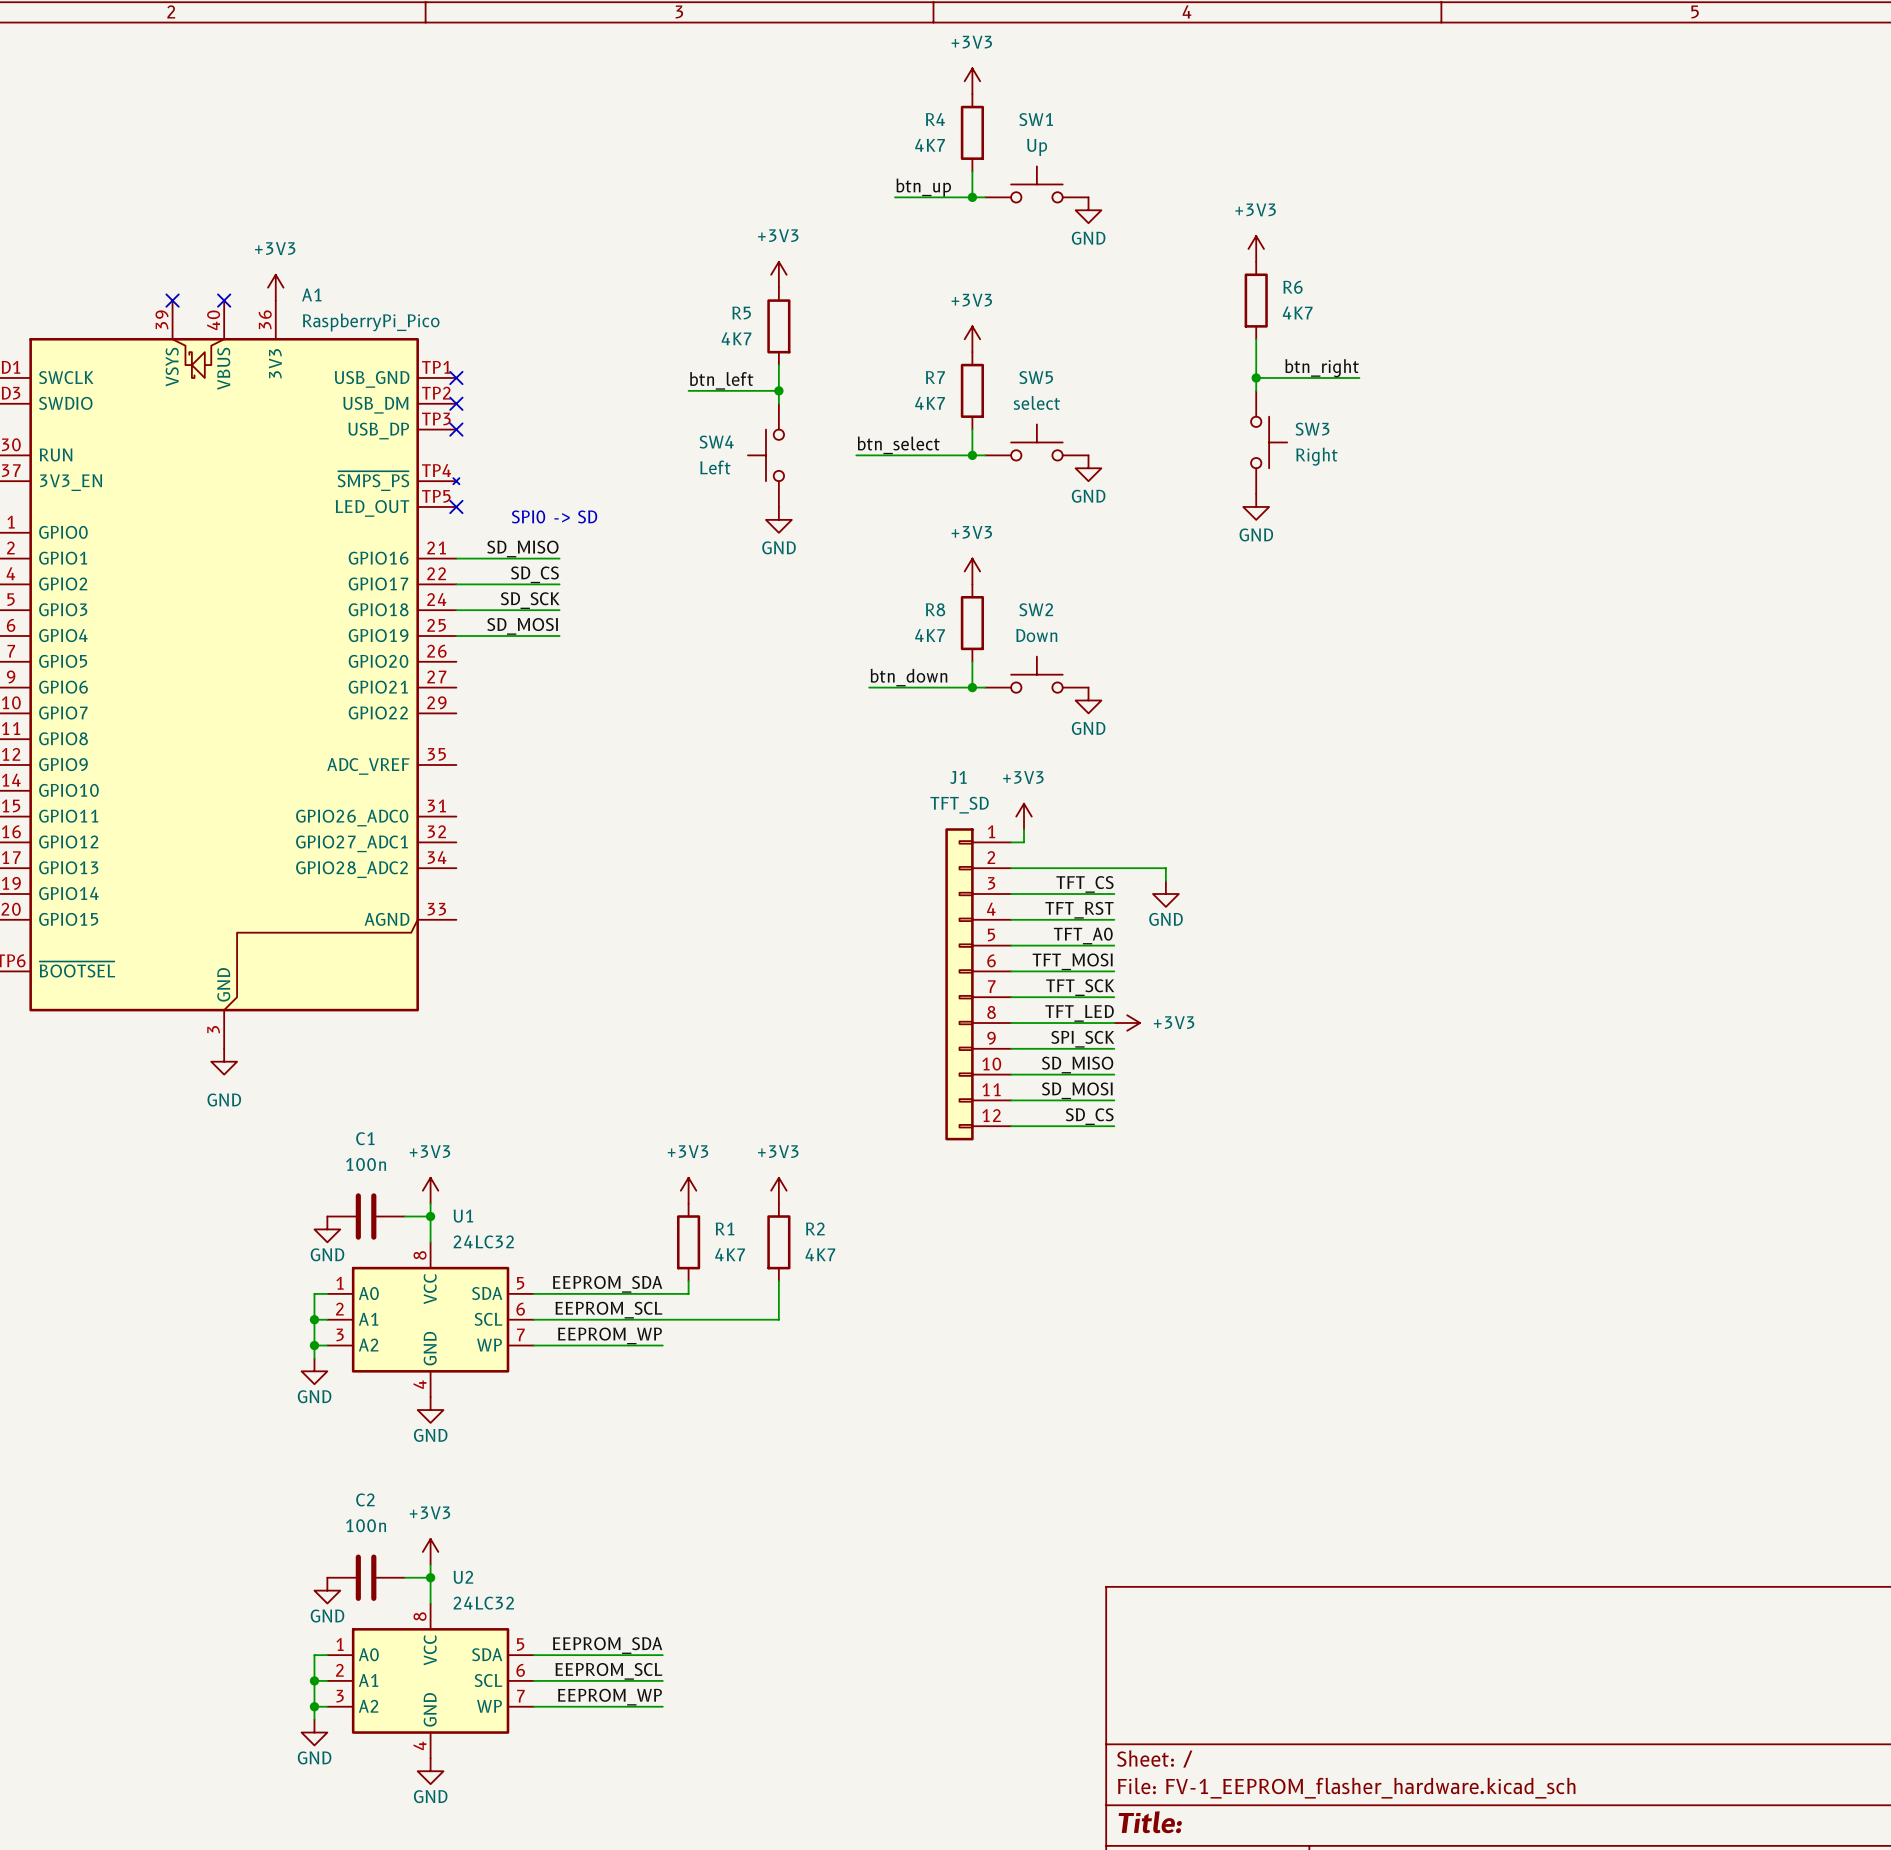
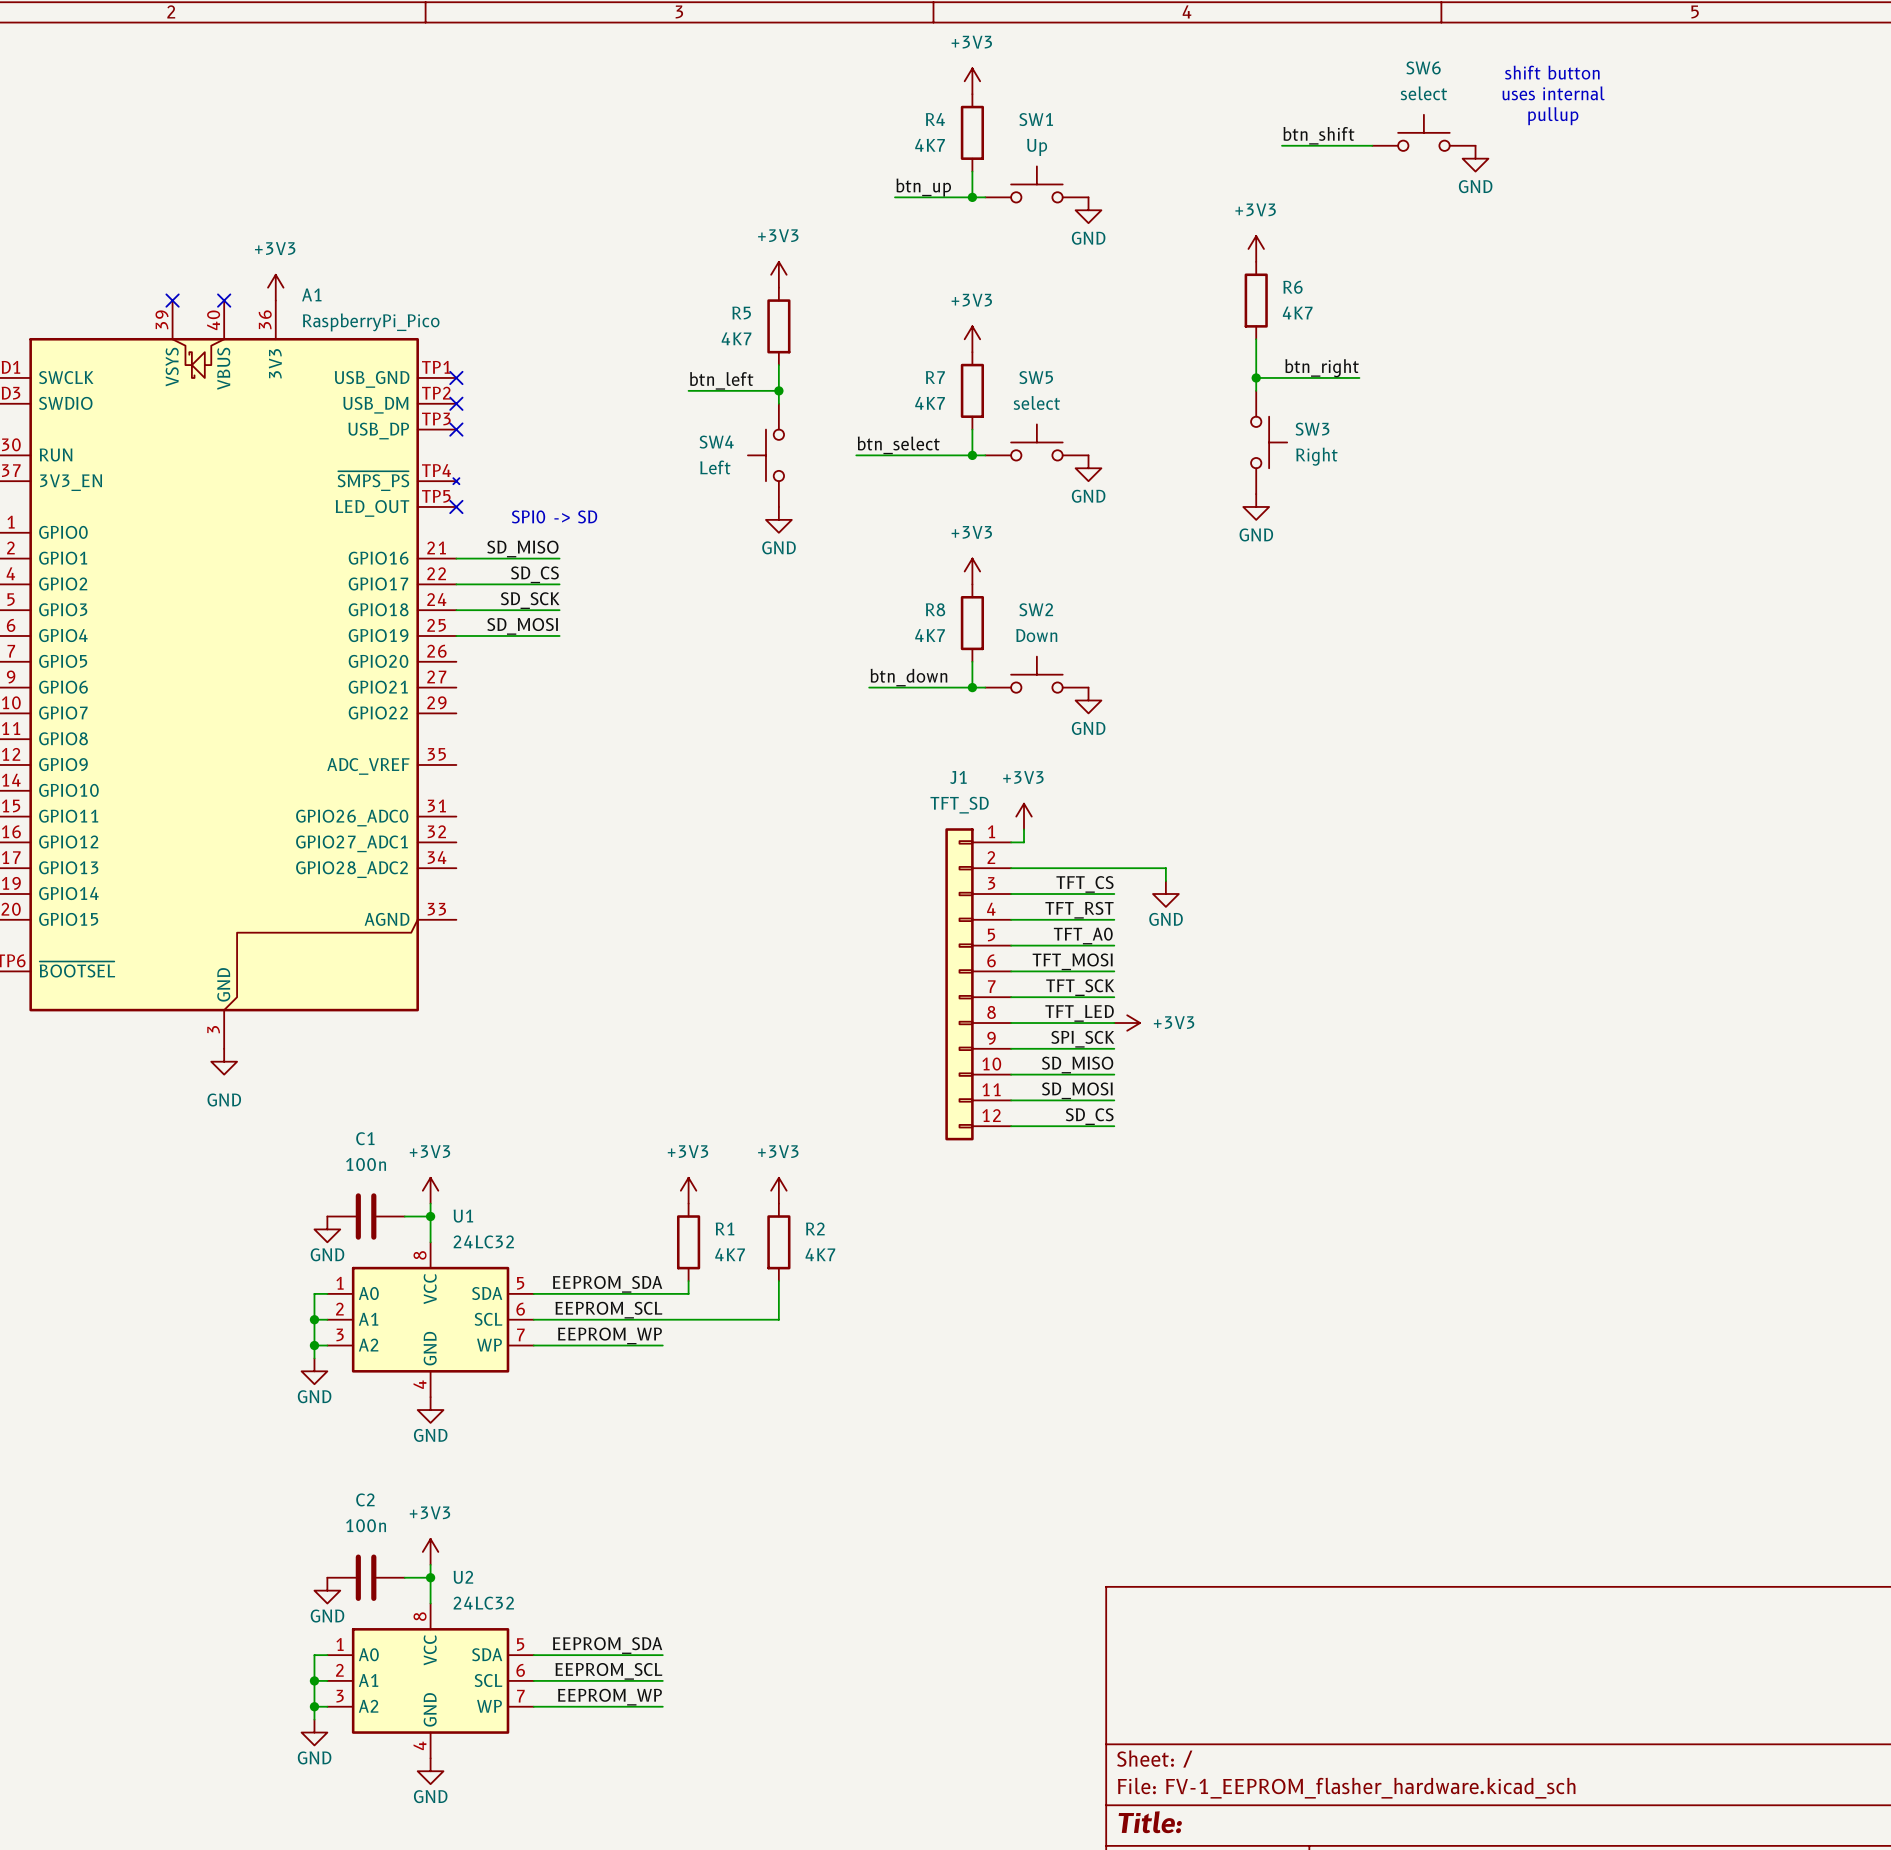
text: none -> shift button (1552, 72)
text: none -> uses internal (1553, 93)
text: none -> pullup (1553, 116)
SW6: none -> select (1423, 132)
label: none -> btn_shift (1318, 135)
wire: none -> (1282, 145) (1372, 145)
power symbol: none -> GND (1475, 158)

